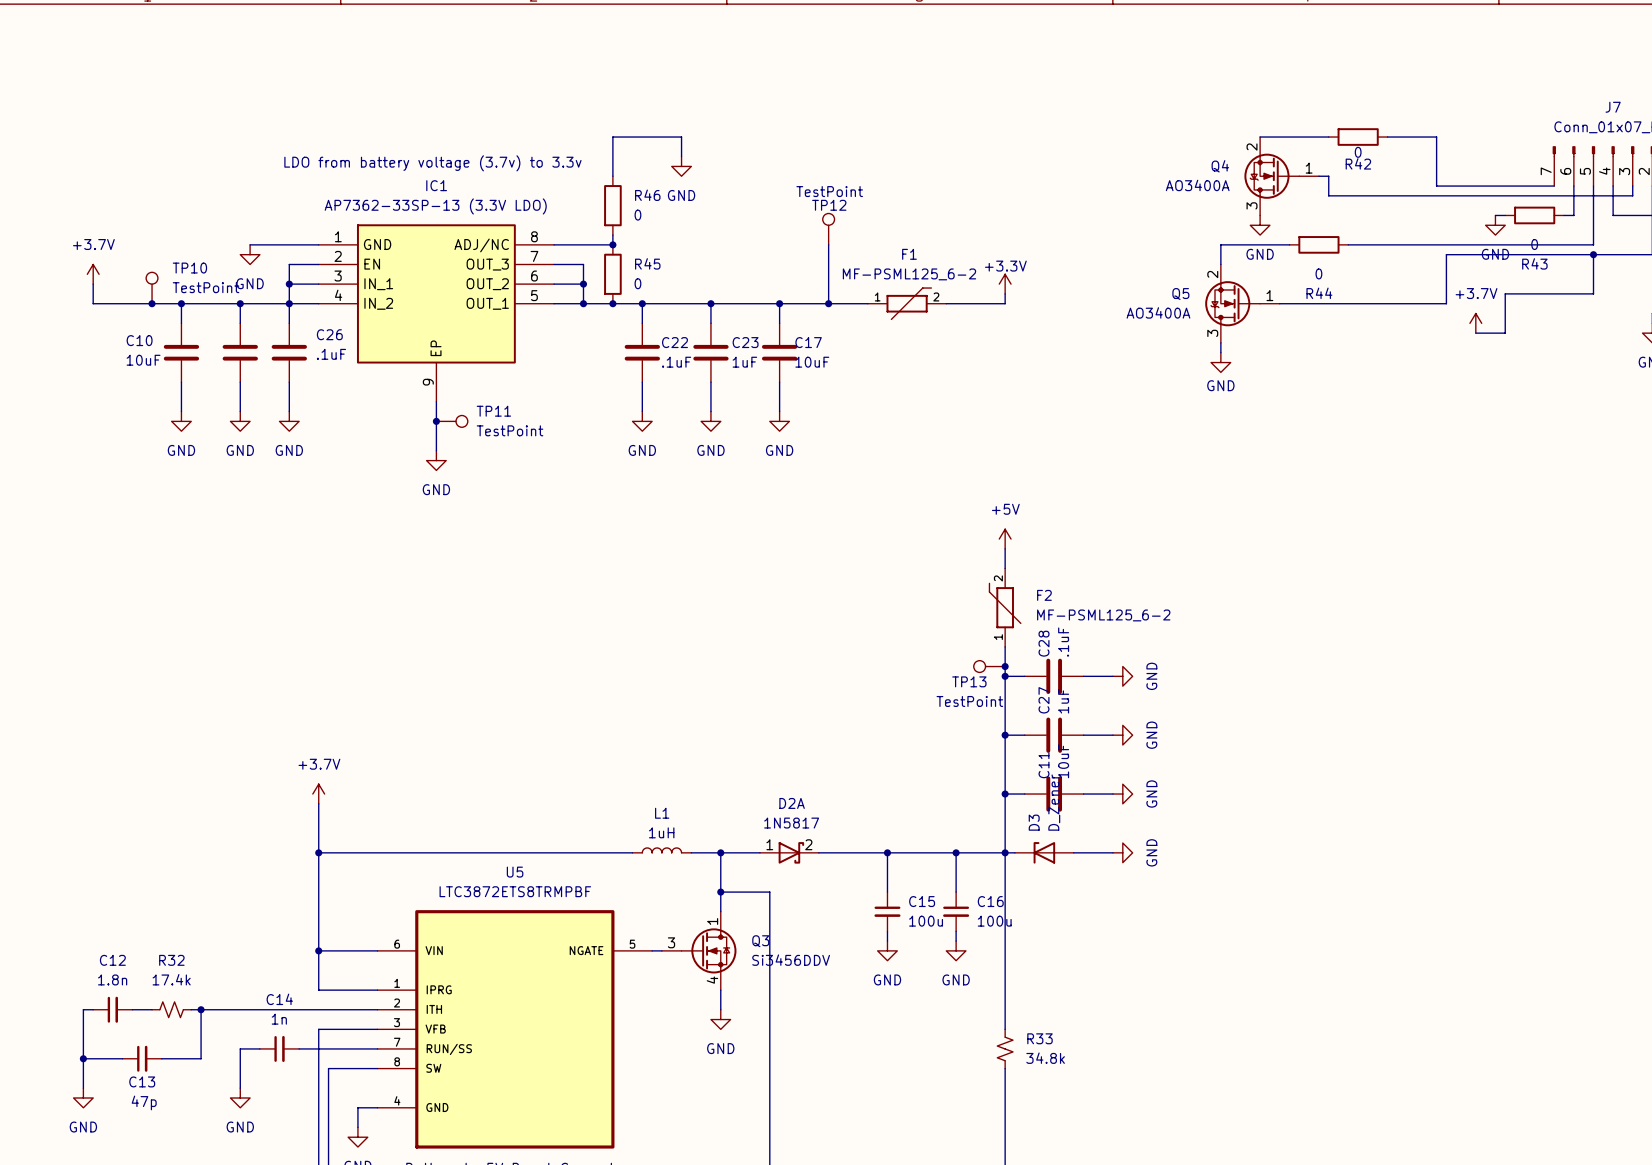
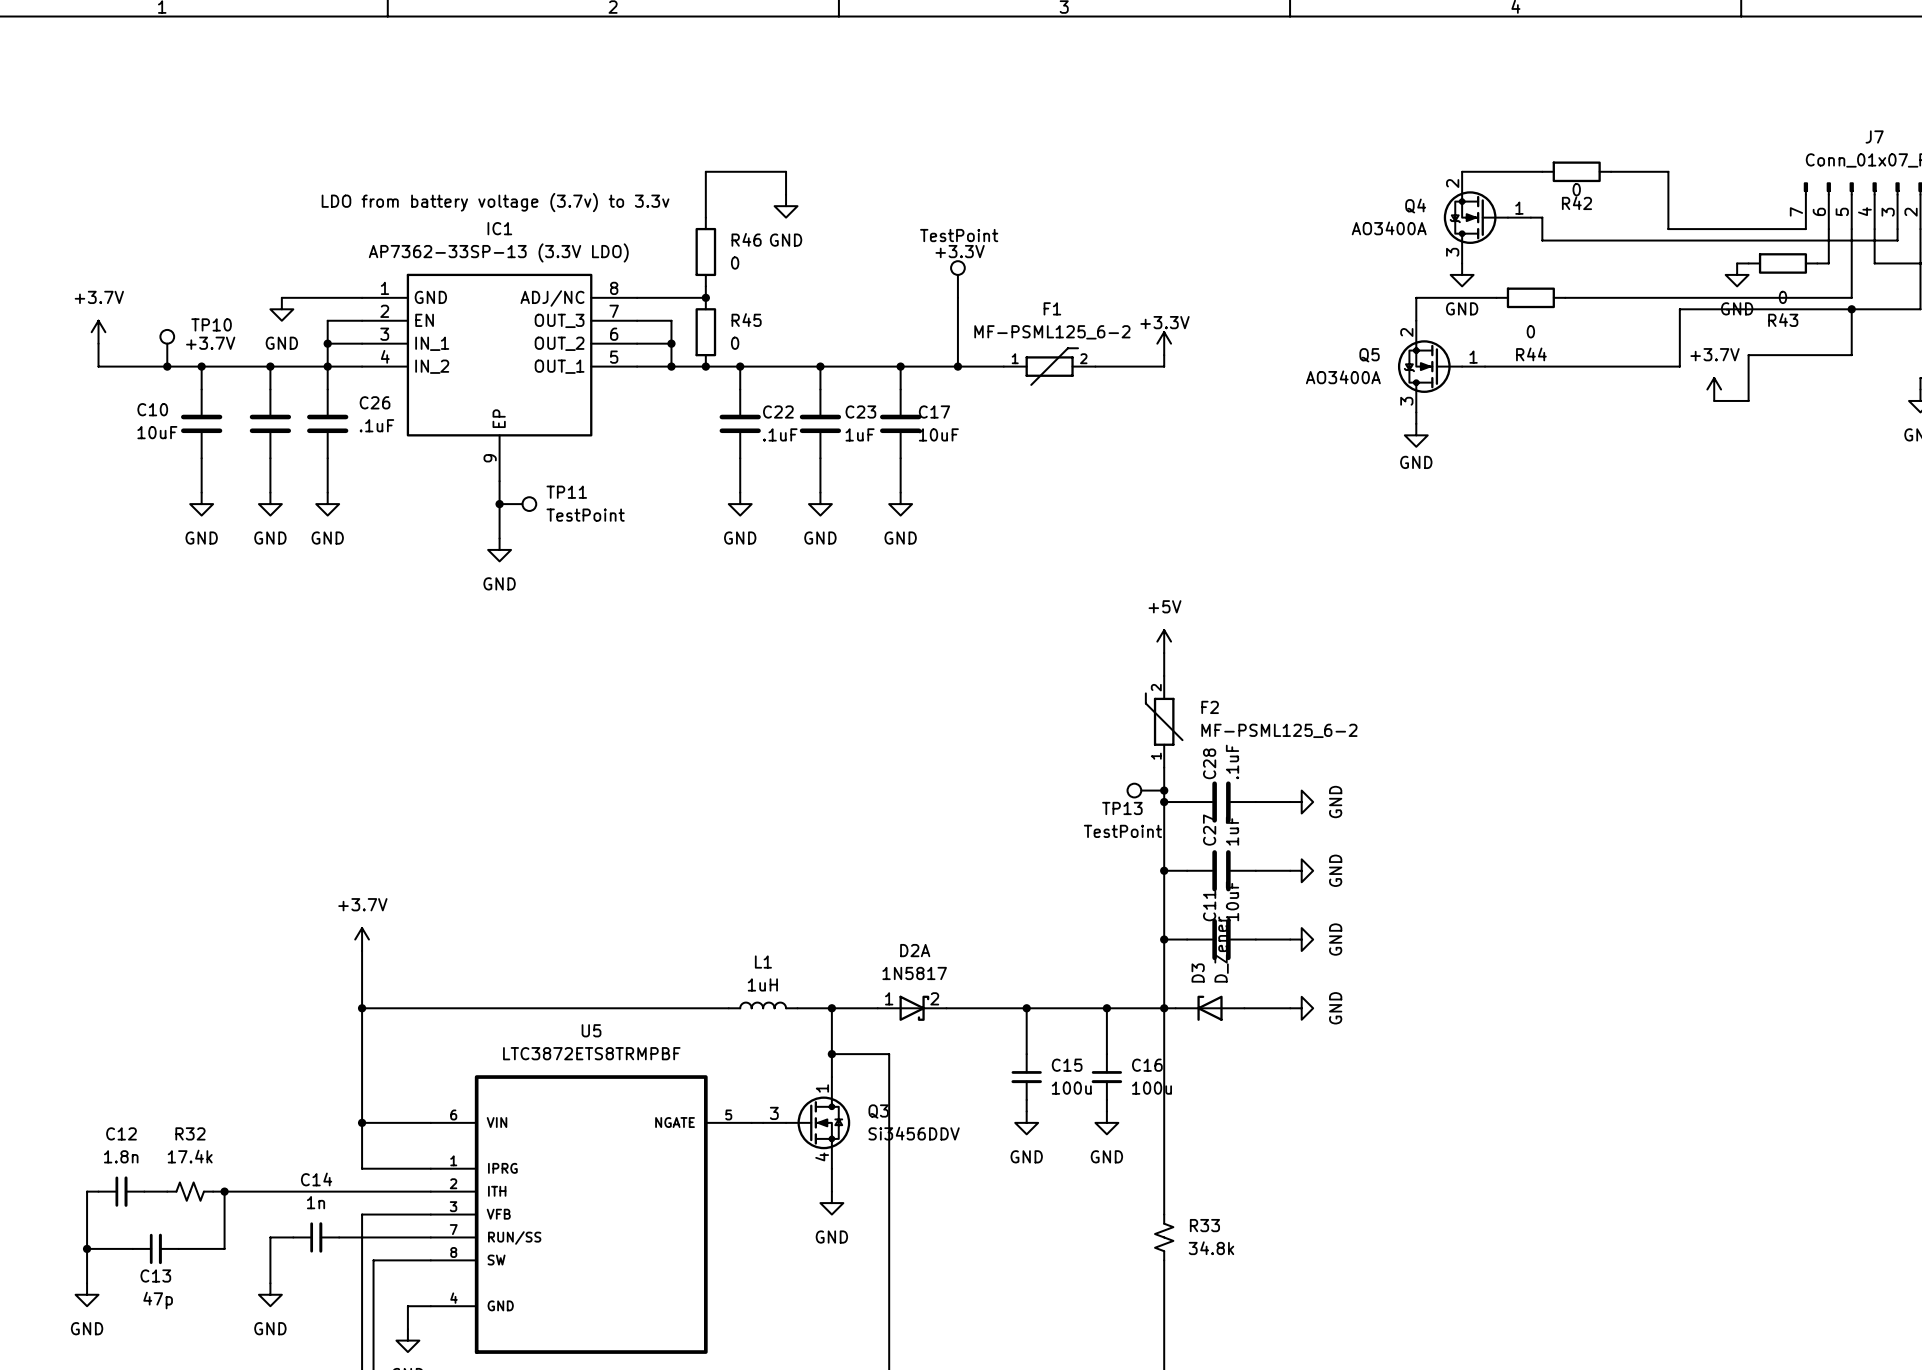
TP12 name: TP12 (829, 205) -> +3.3V (960, 251)
TP10 value: TestPoint (206, 287) -> +3.7V (210, 343)

